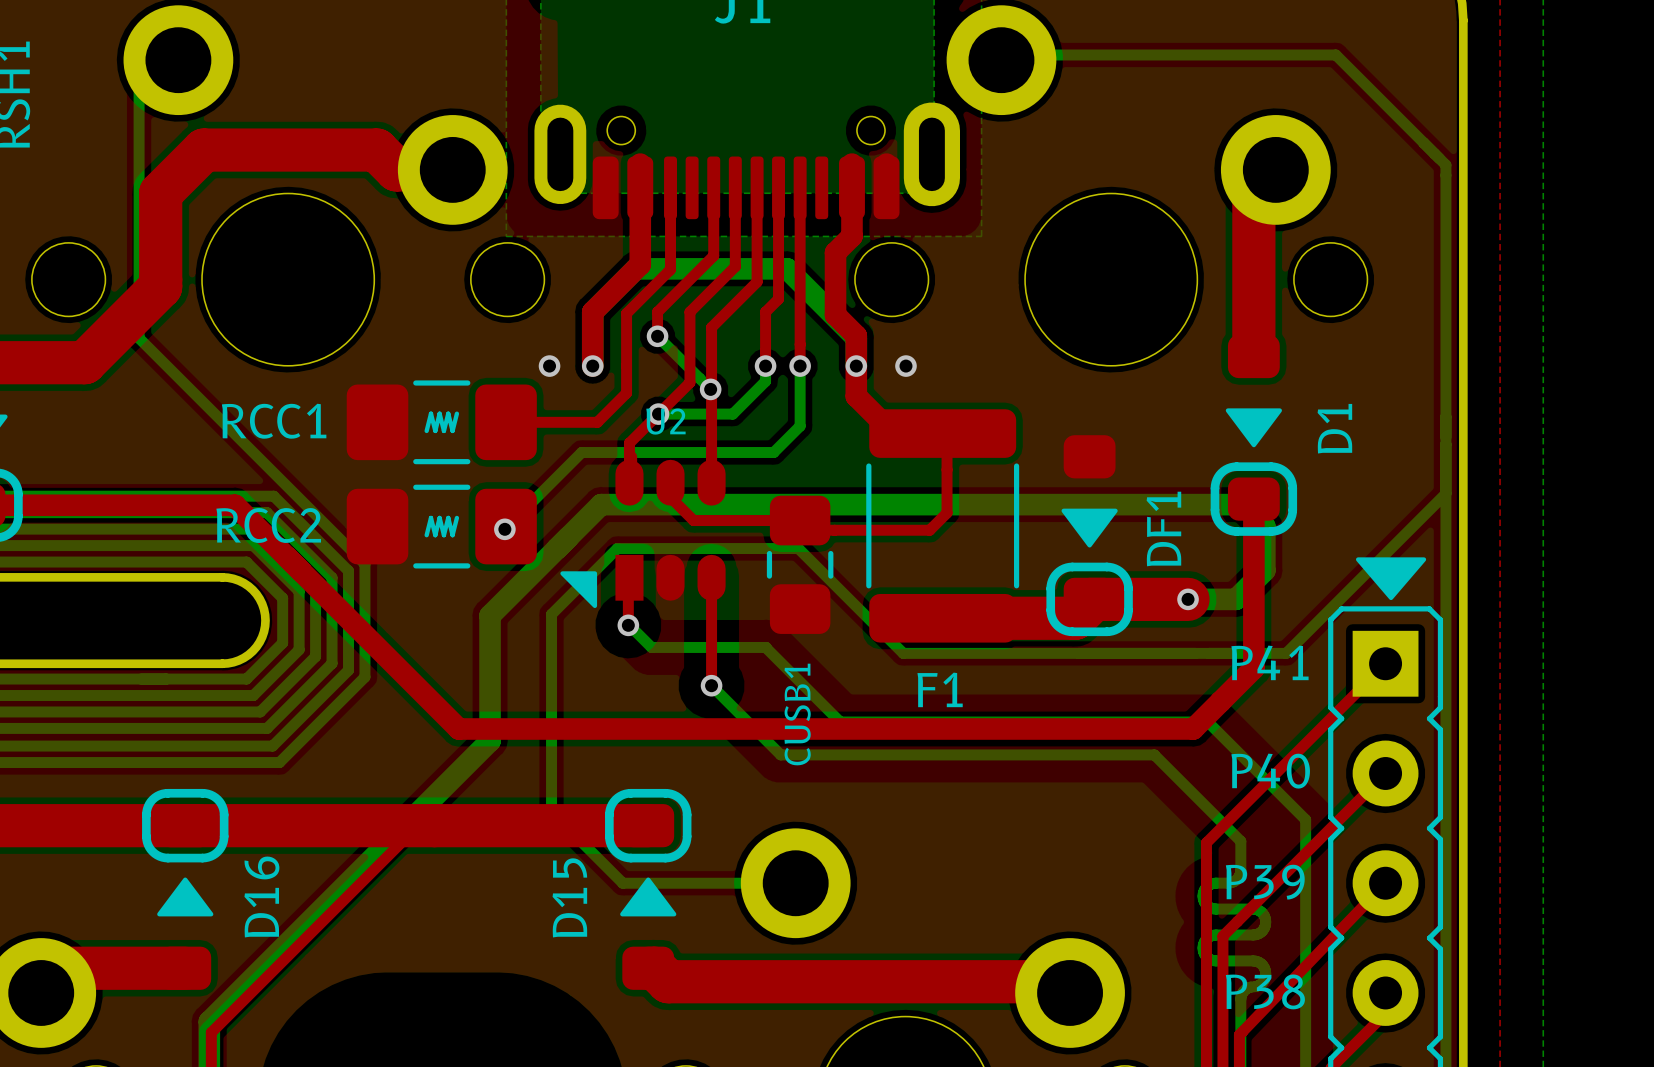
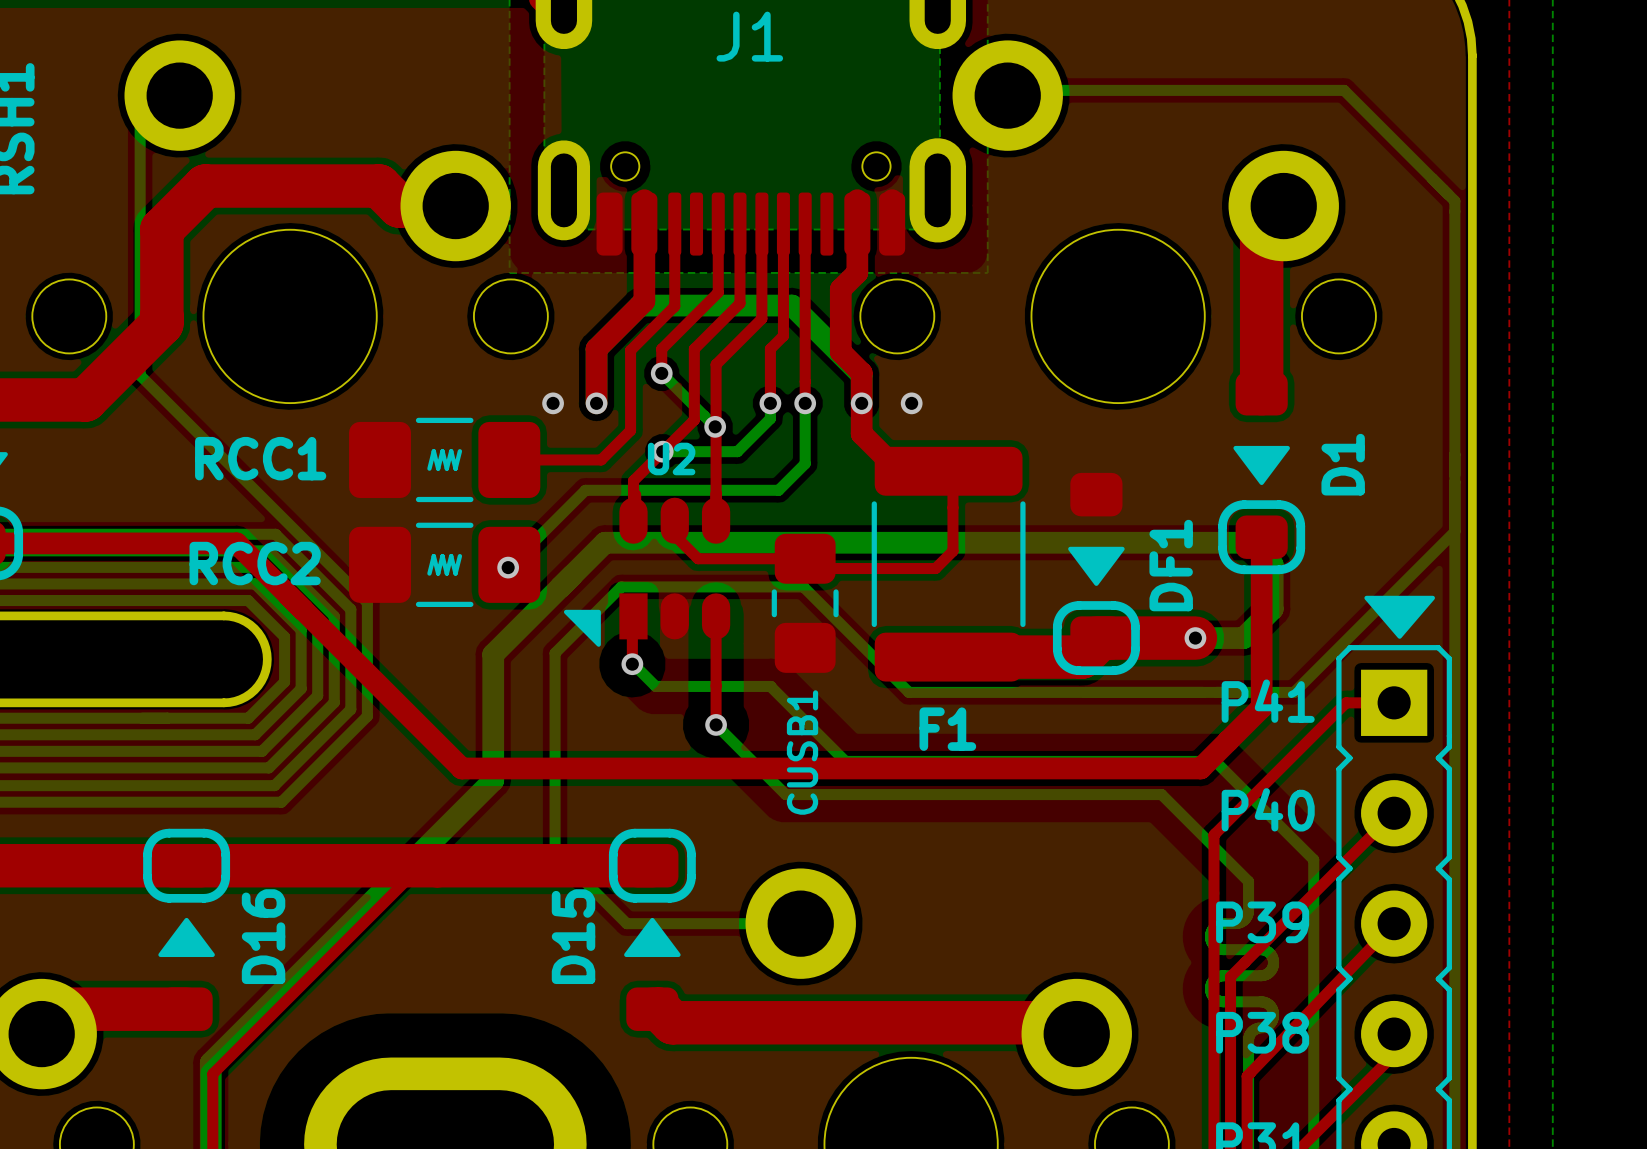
top track: (1385, 663) (1206, 842) -> (1394, 702) (1346, 702) (1213, 835) (1213, 883)

